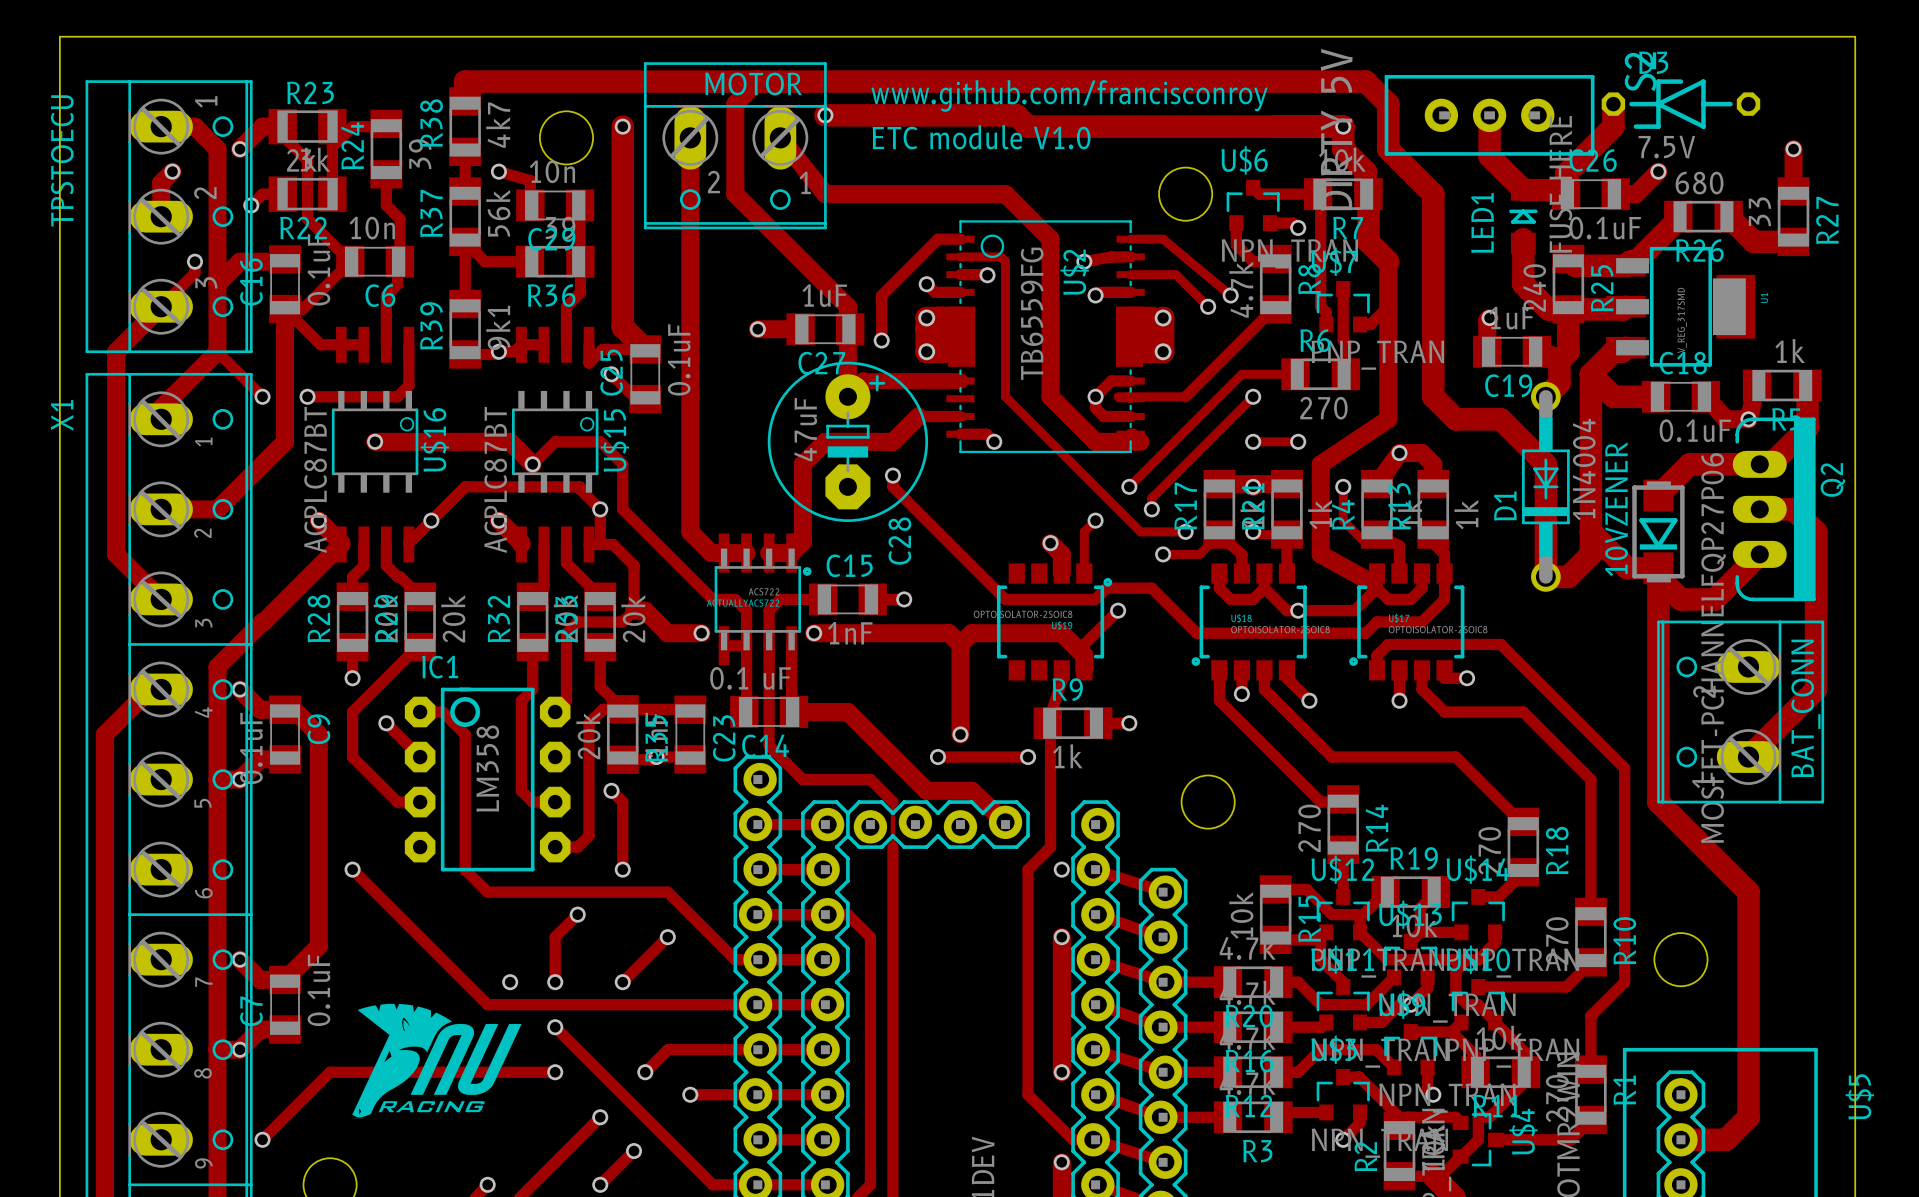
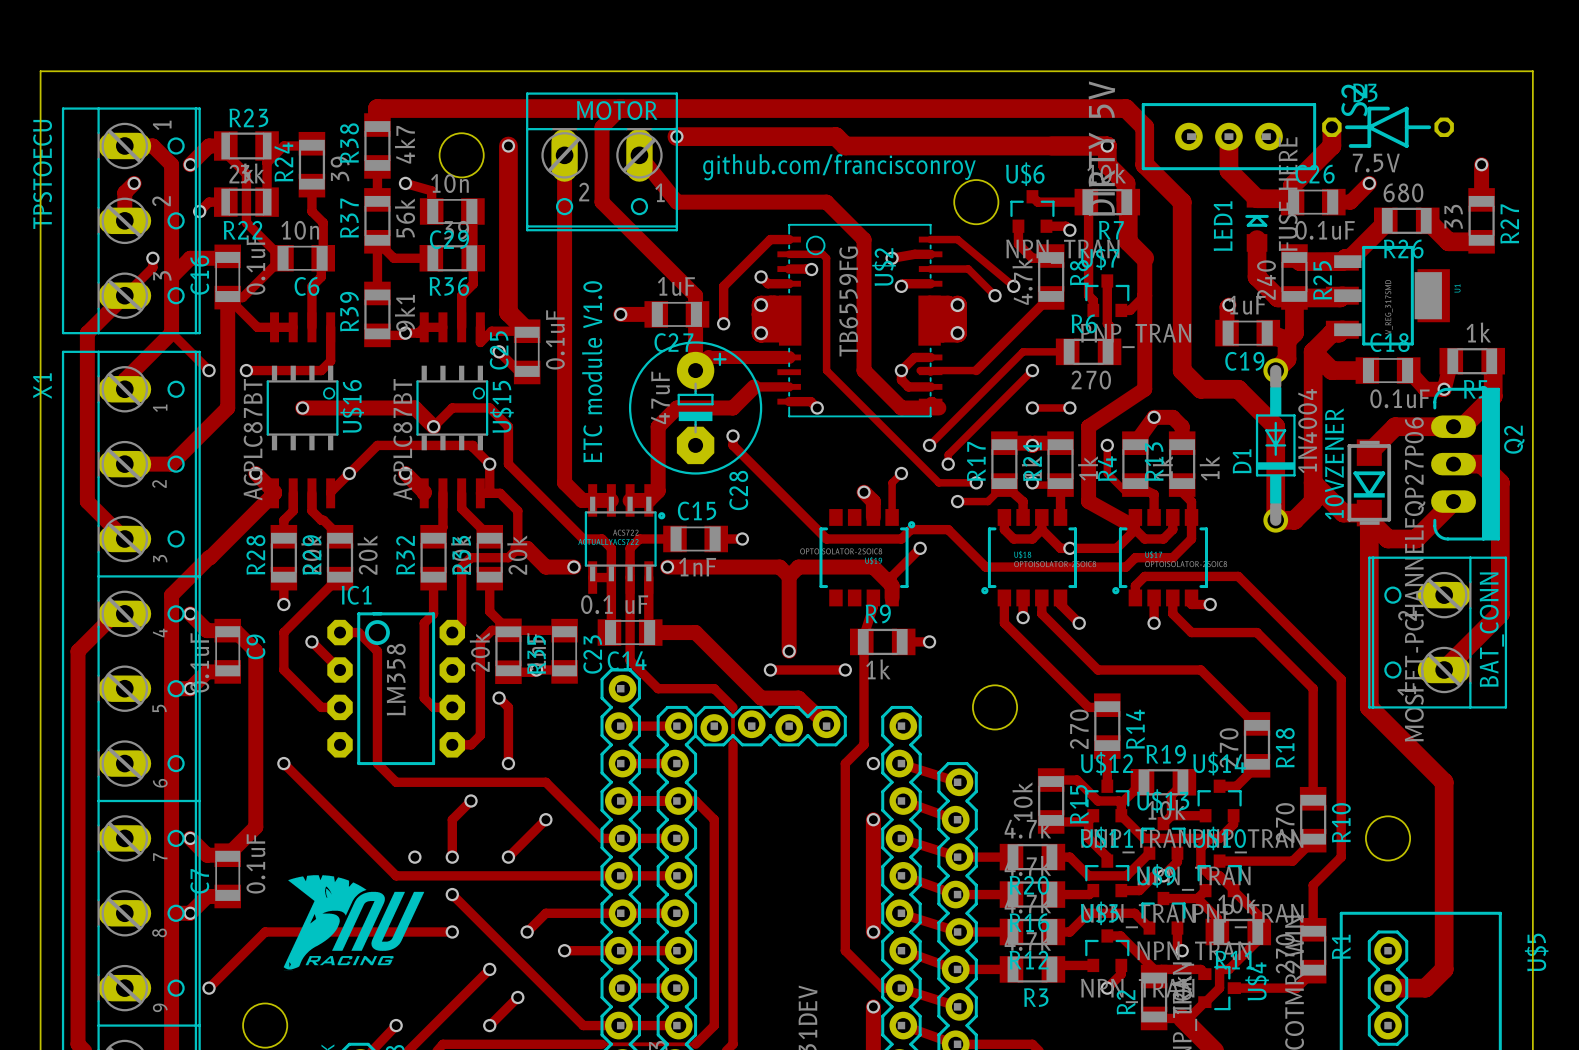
text: www.github.com/francisconroy (1069, 95) -> none
text rotation: 0° (981, 137) -> 90° counterclockwise (592, 371)
text position: ETC module V1.0 (981, 137) -> ETC module V1.0 (592, 371)
text: none -> github.com/francisconroy (839, 167)

